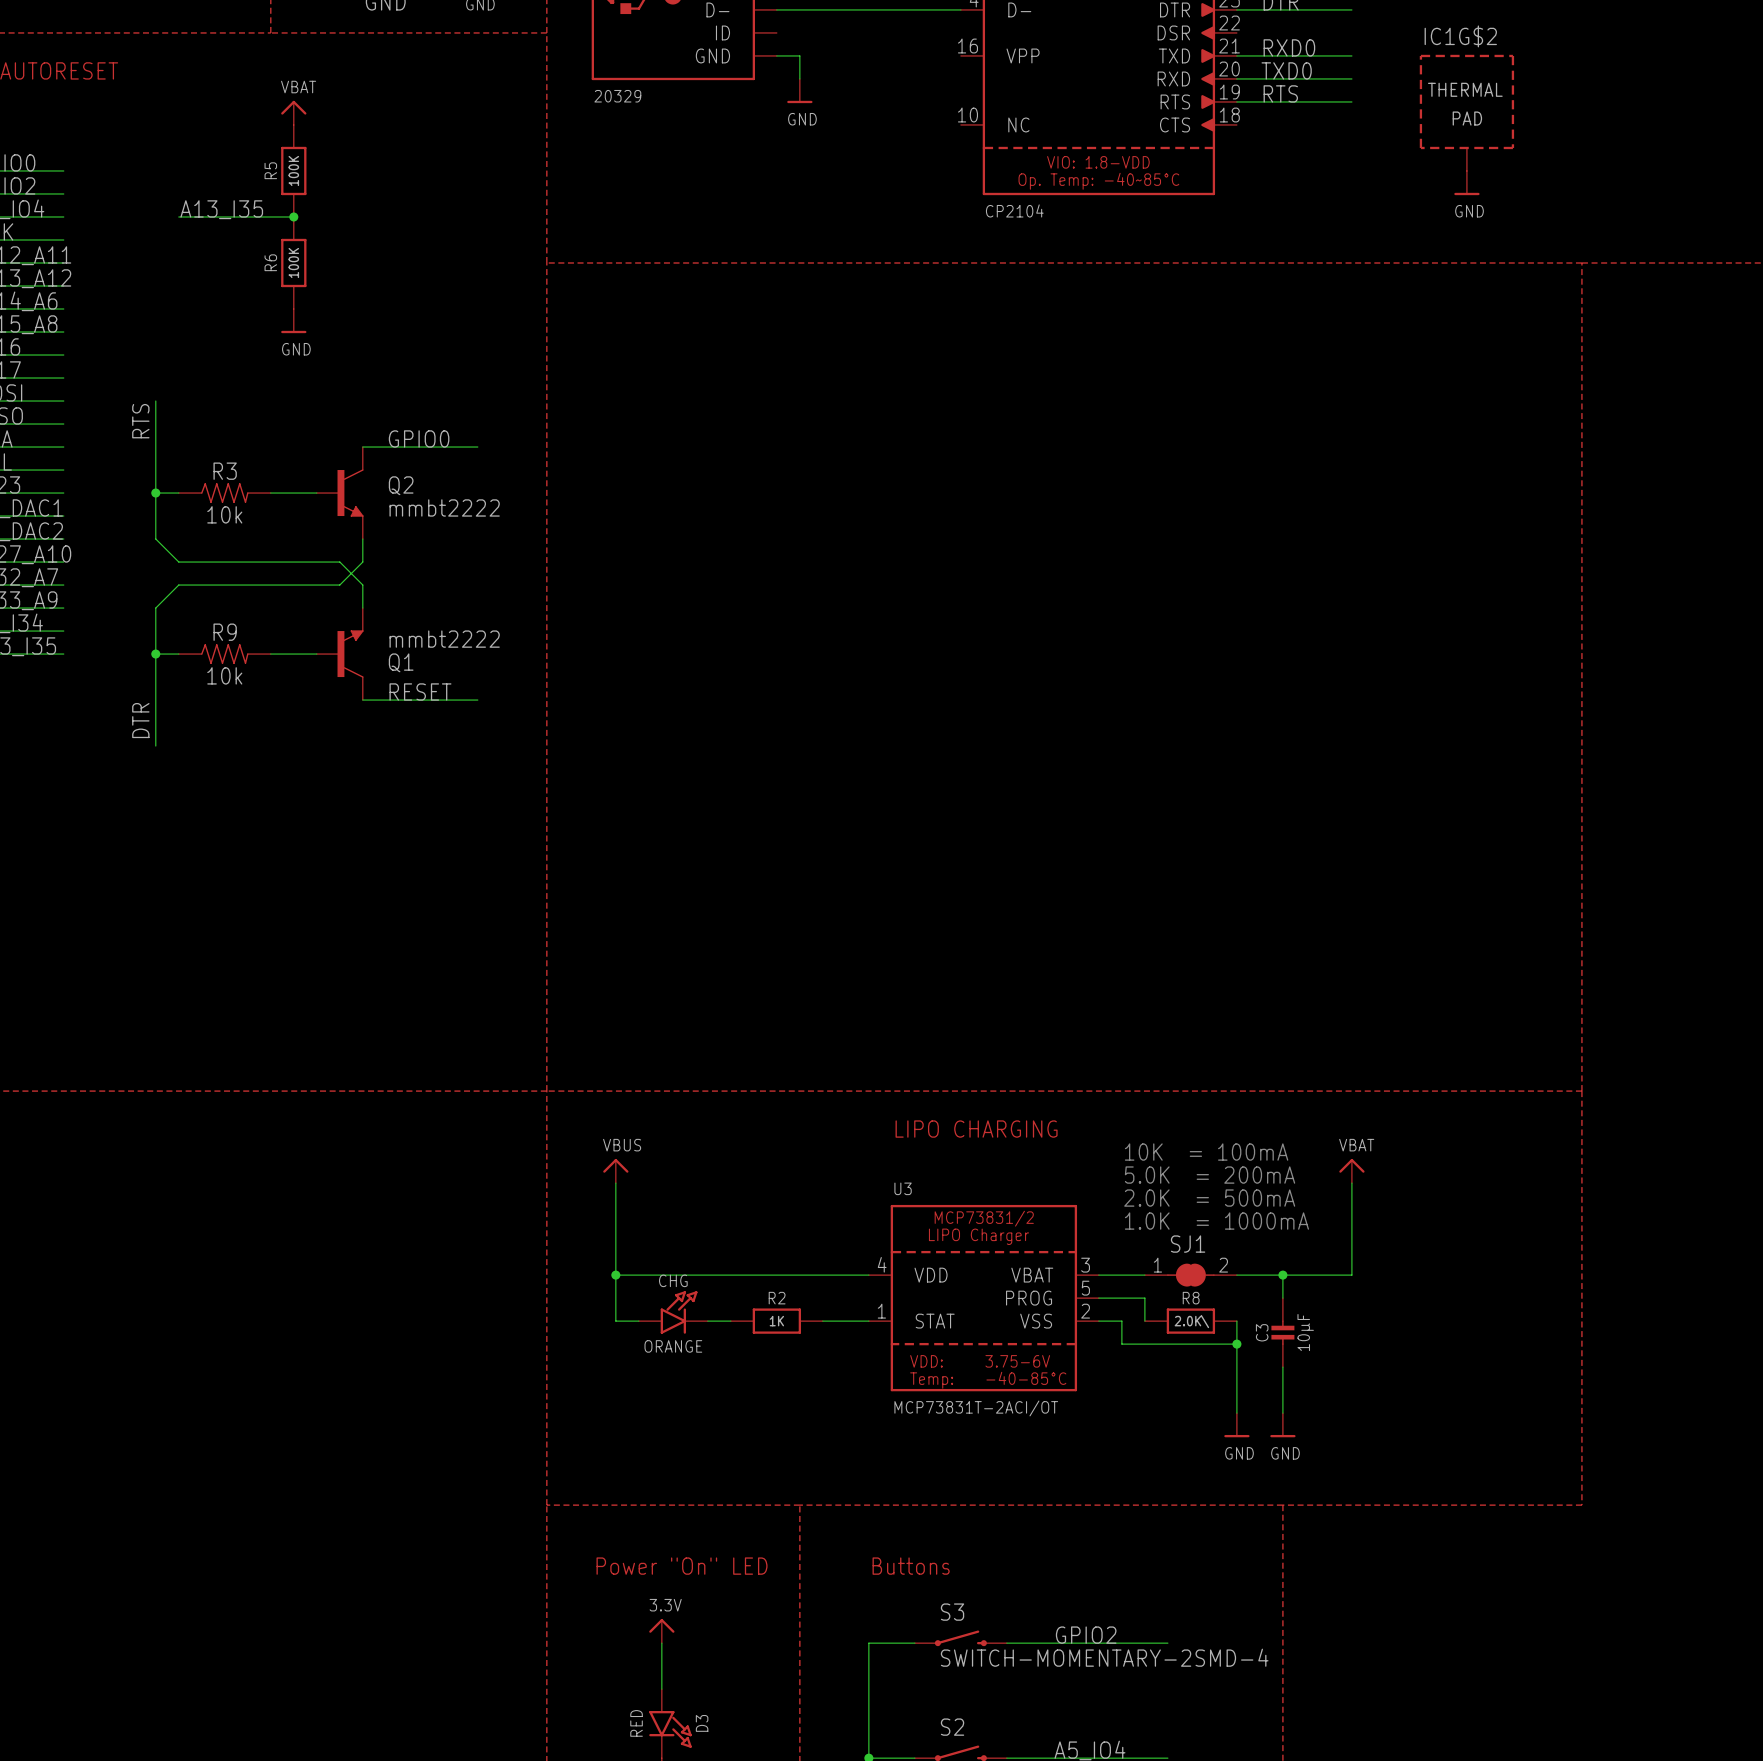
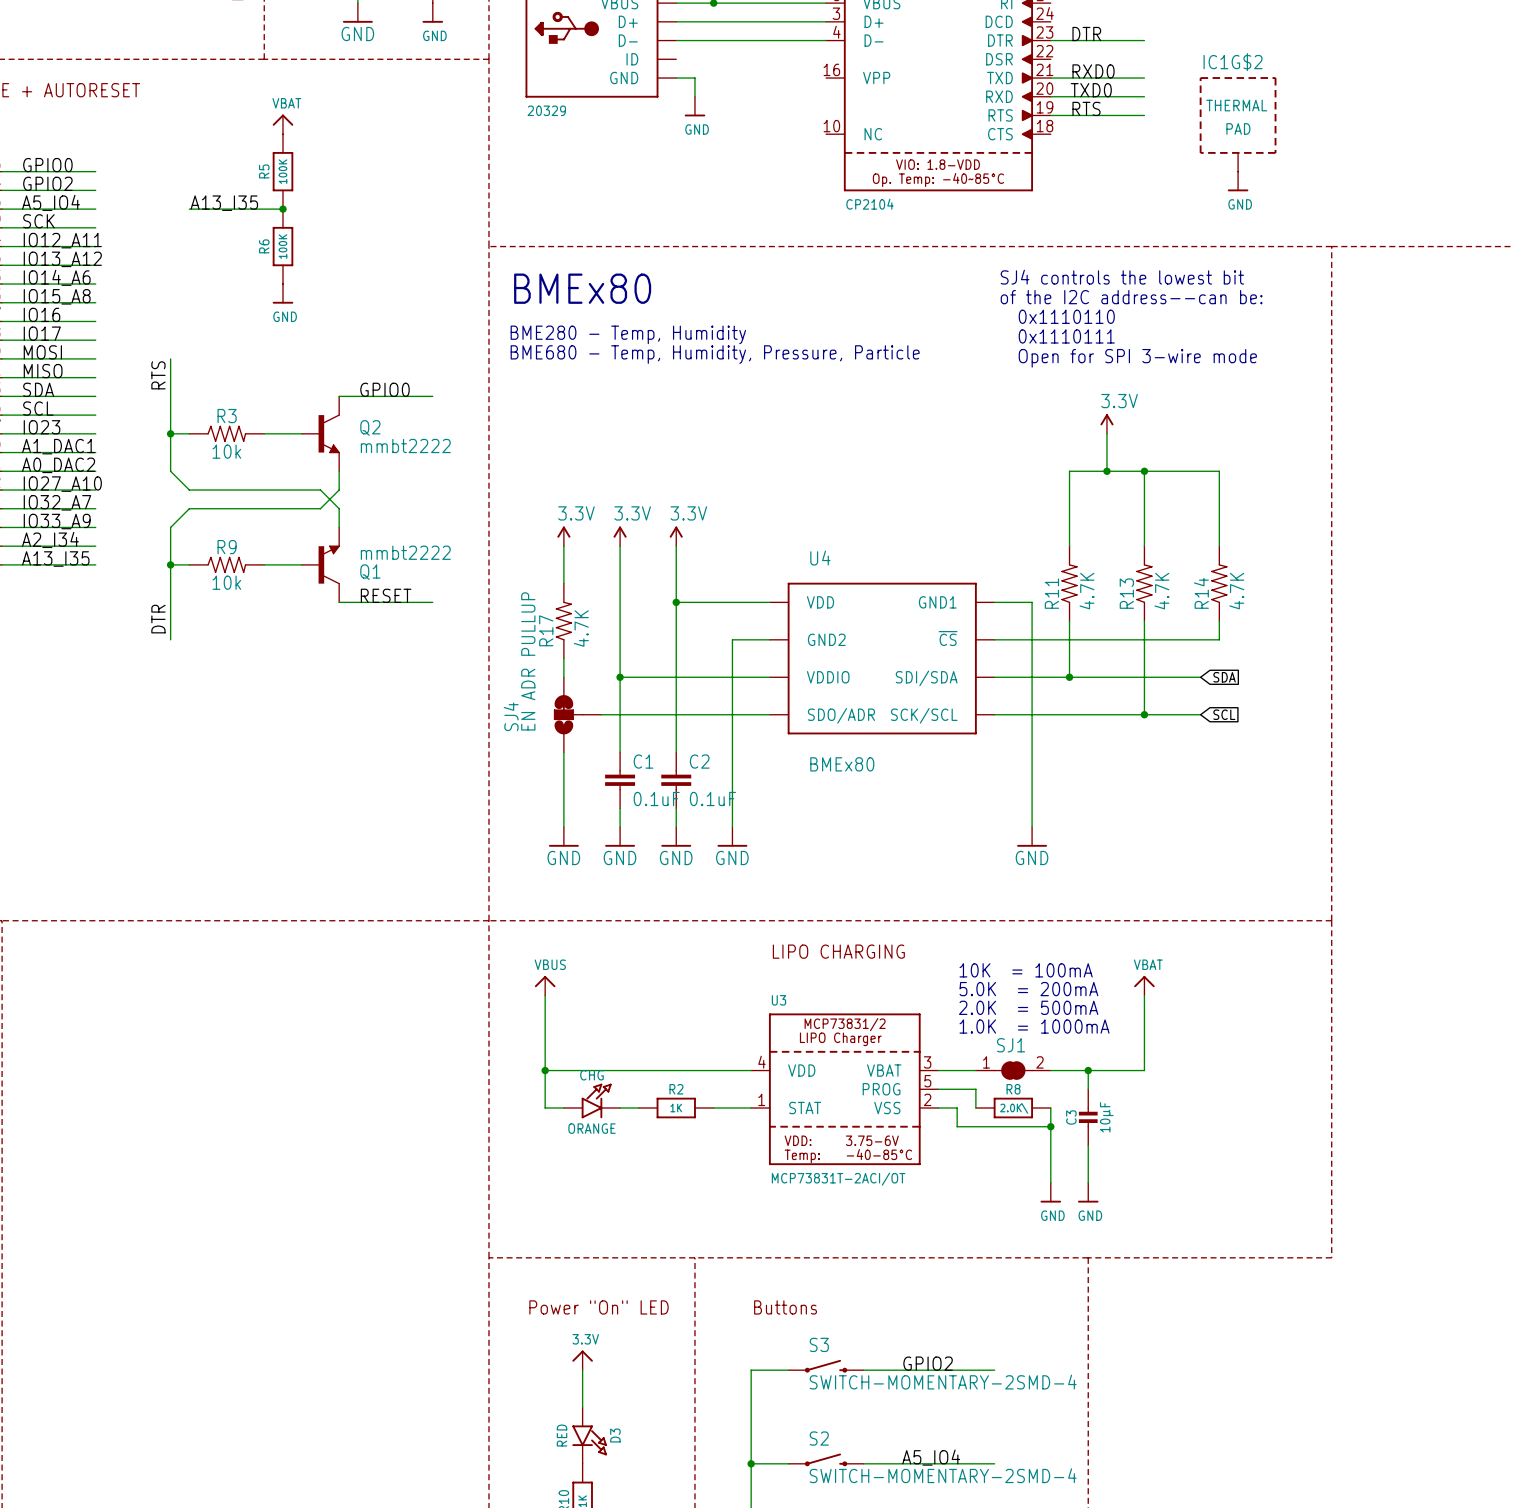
text: none -> SJ4 controls the lowest bit (1122, 277)
text: none -> BMEx80 (582, 288)
text: none -> of the I2C address--can be: (1131, 297)
text: none -> 0x1110110 (1066, 316)
text: none -> BME280 - Temp, Humidity (628, 334)
text: none -> 0x1110111 (1066, 336)
text: none -> BME680 - Temp, Humidity, Pressure, Particle (715, 354)
text: none -> Open for SPI 3-wire mode (1137, 358)
power symbol: none -> 3.3V (1106, 424)
wire: none -> (1106, 433) (1106, 471)
junction: none -> (1106, 471)
wire: none -> (1144, 471) (1144, 546)
junction: none -> (1144, 471)
power symbol: none -> 3.3V (563, 536)
power symbol: none -> 3.3V (620, 536)
power symbol: none -> 3.3V (676, 536)
wire: none -> (563, 546) (563, 583)
wire: none -> (620, 546) (620, 752)
wire: none -> (676, 546) (676, 752)
wire: none -> (1069, 546) (1069, 471) (1219, 471) (1219, 546)
R11: none -> 4.7K (1069, 583)
R13: none -> 4.7K (1144, 583)
R14: none -> 4.7K (1219, 583)
wire: none -> (676, 602) (769, 602)
junction: none -> (676, 602)
wire: none -> (994, 602) (1032, 602) (1032, 827)
R17: none -> 4.7K (563, 621)
wire: none -> (1069, 621) (1069, 677)
wire: none -> (1144, 621) (1144, 714)
wire: none -> (1219, 621) (1219, 639) (994, 639)
wire: none -> (769, 639) (732, 639) (732, 827)
wire: none -> (563, 658) (563, 677)
U4: none -> BMEx80 (882, 658)
wire: none -> (620, 677) (769, 677)
junction: none -> (620, 677)
wire: none -> (994, 677) (1200, 677)
junction: none -> (1069, 677)
global label: none -> SDA (1224, 677)
SJ4: none -> EN ADR PULLUP (577, 714)
wire: none -> (601, 714) (769, 714)
wire: none -> (994, 714) (1200, 714)
junction: none -> (1144, 714)
global label: none -> SCL (1224, 714)
wire: none -> (563, 752) (563, 827)
C1: none -> 0.1uF (620, 780)
C2: none -> 0.1uF (676, 780)
wire: none -> (620, 808) (620, 827)
wire: none -> (676, 808) (676, 827)
power symbol: none -> GND (563, 836)
power symbol: none -> GND (620, 836)
power symbol: none -> GND (676, 836)
power symbol: none -> GND (732, 836)
power symbol: none -> GND (1032, 836)

